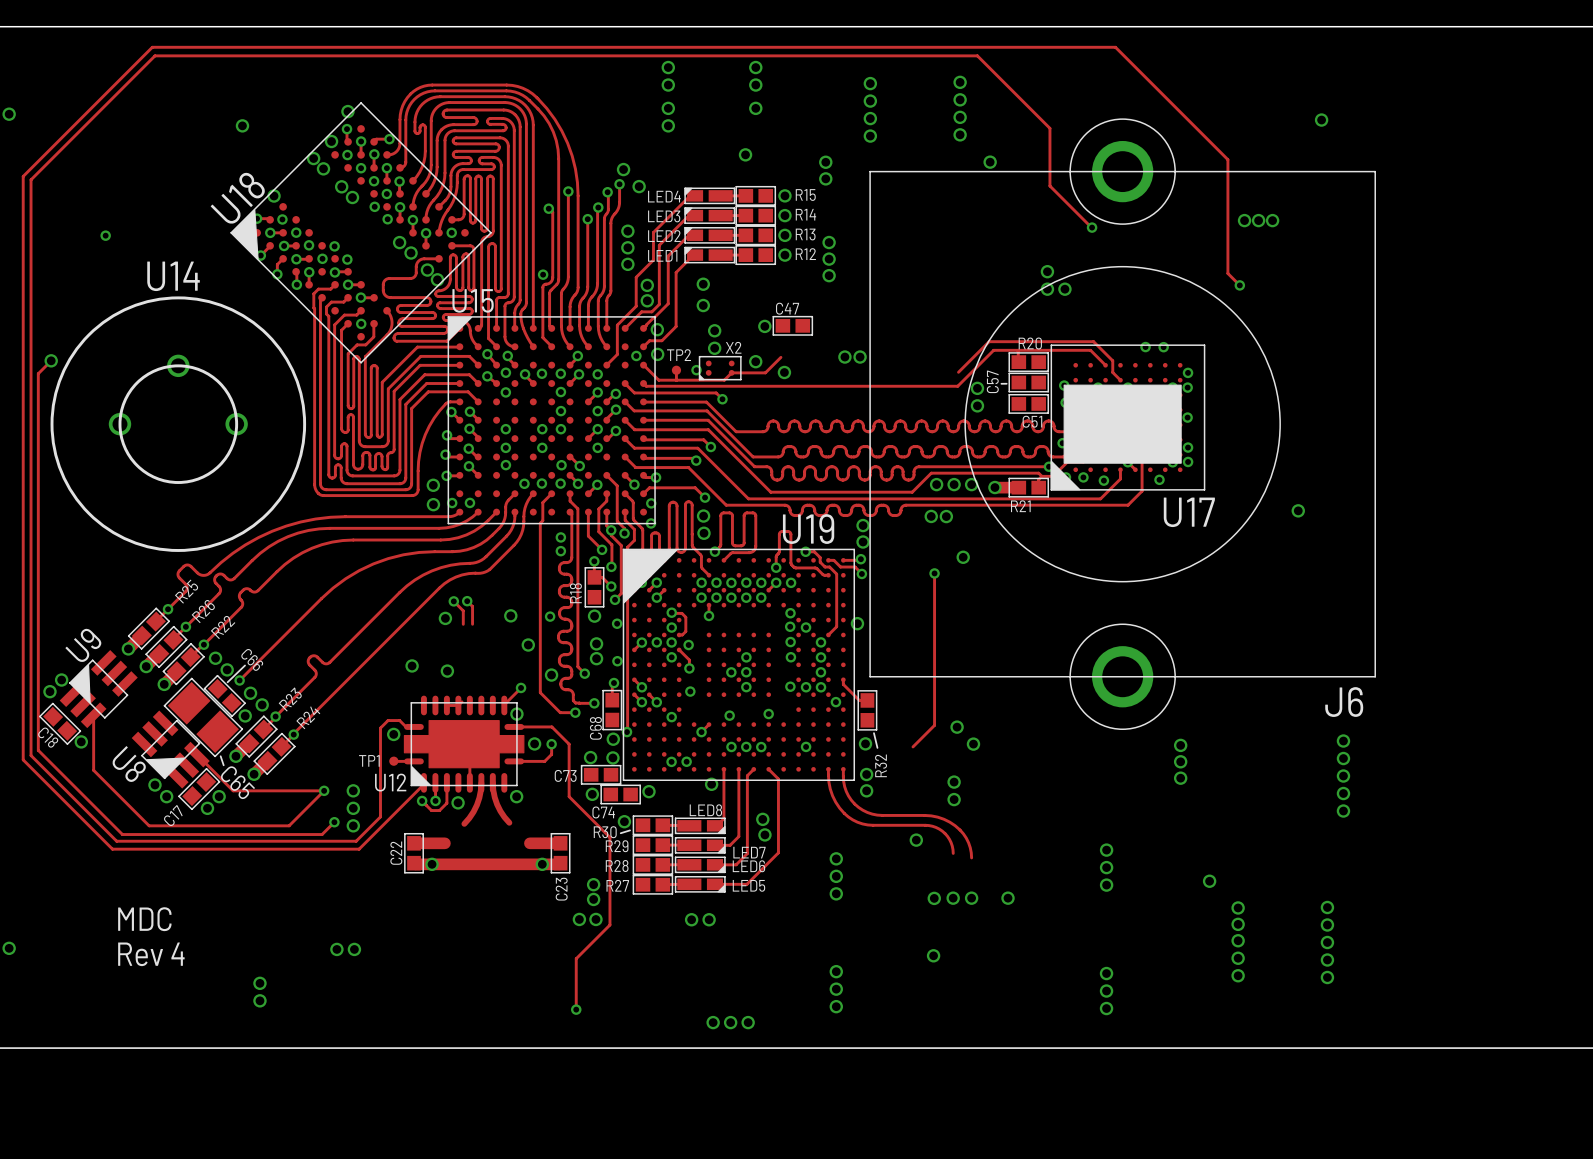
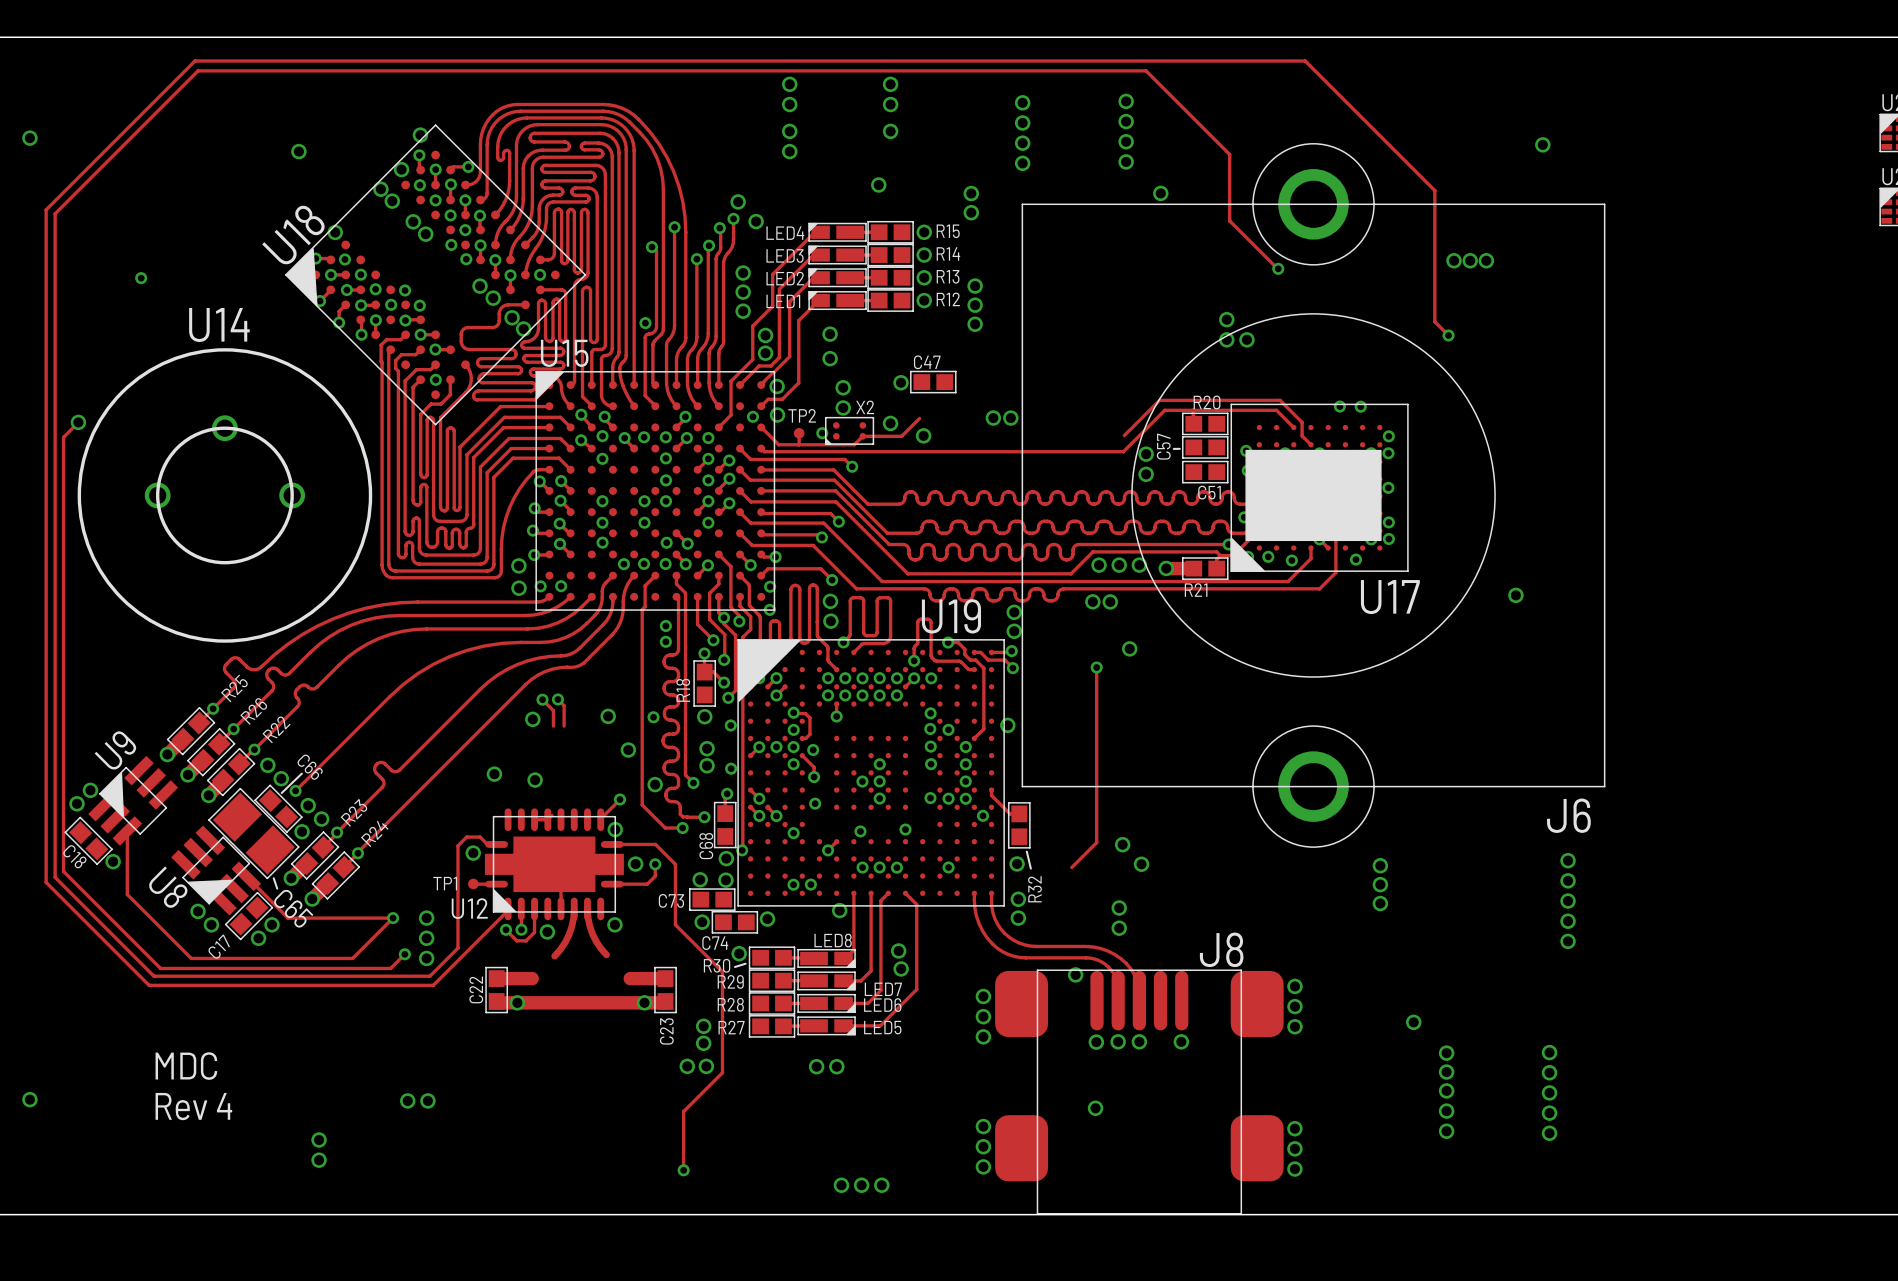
J8: none -> (1139, 1092)

